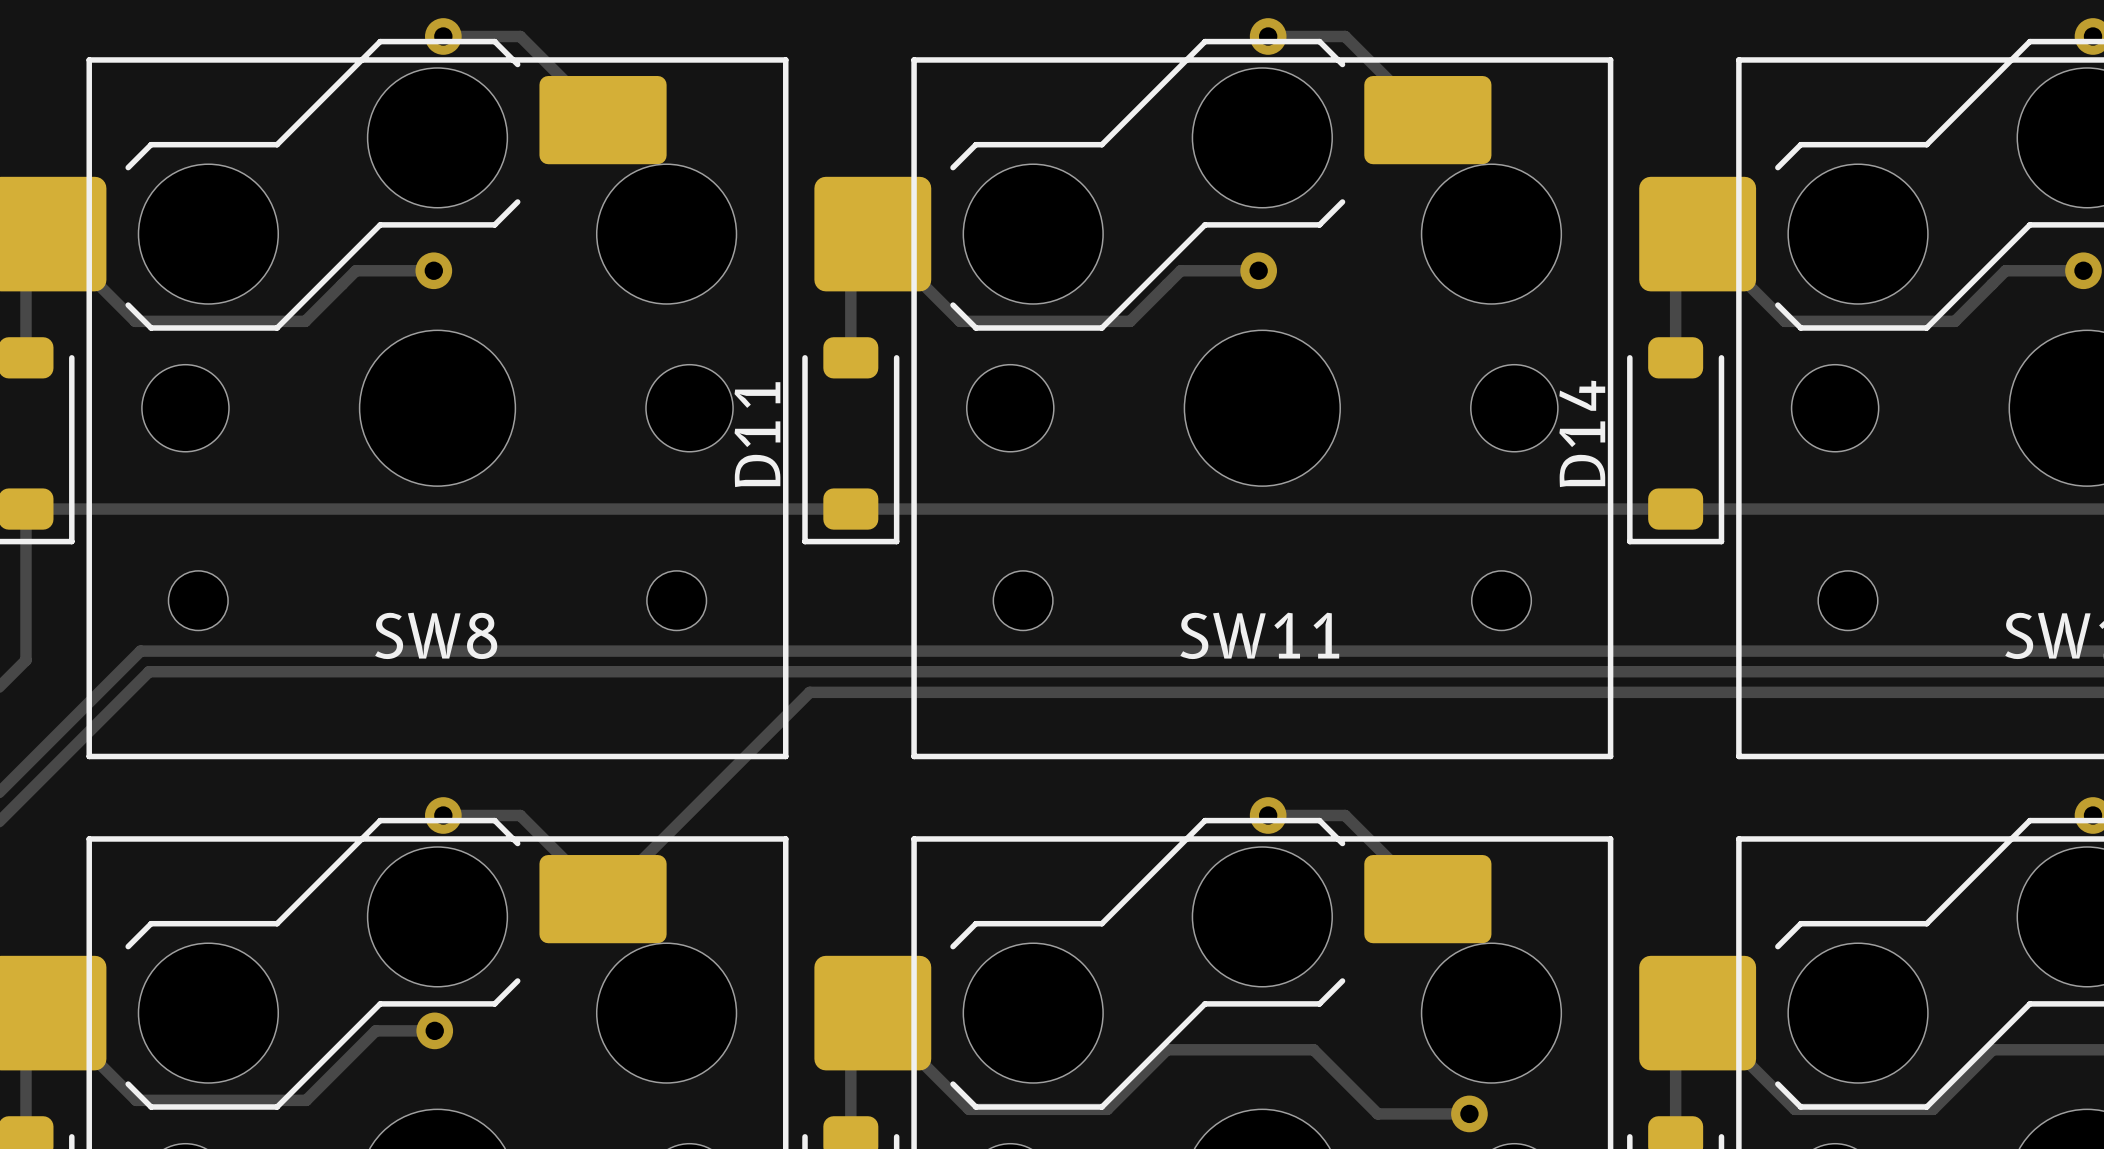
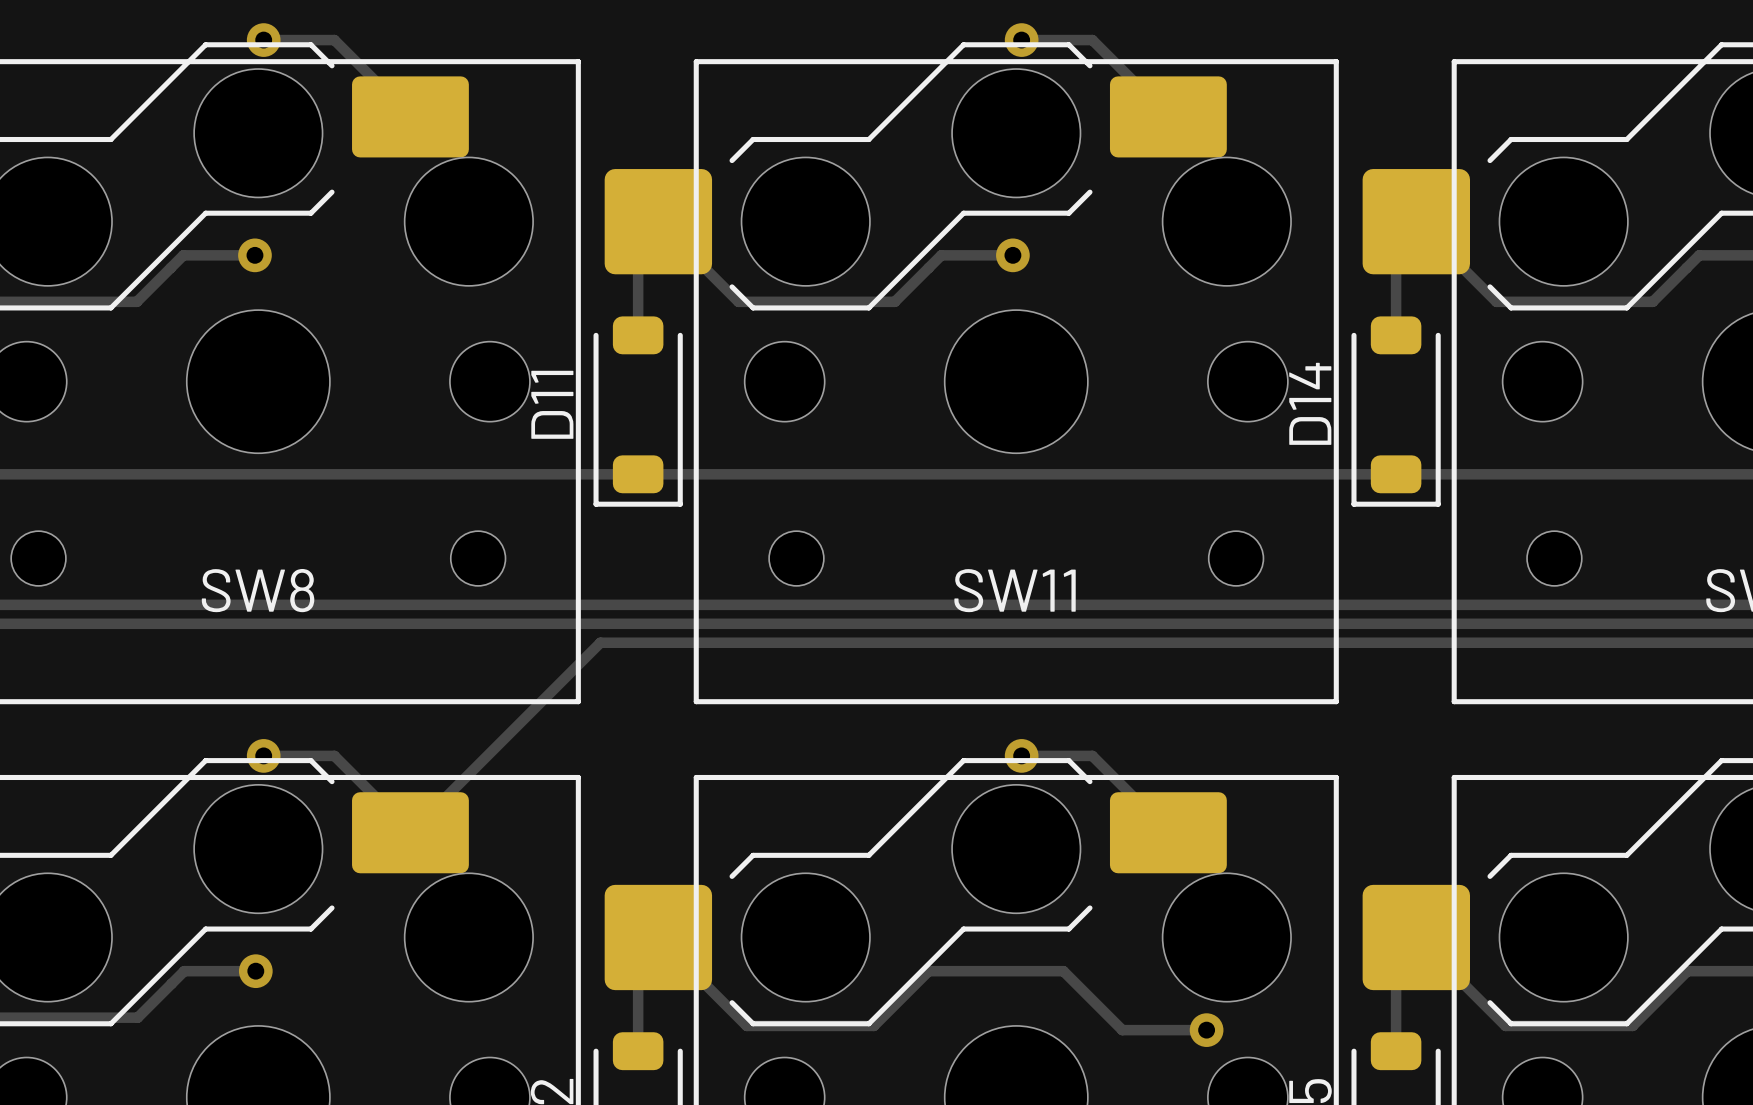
track: (434, 1030) (375, 1030) (356, 1049) -> (255, 971) (184, 971)
via position: (434, 1030) -> (255, 971)

